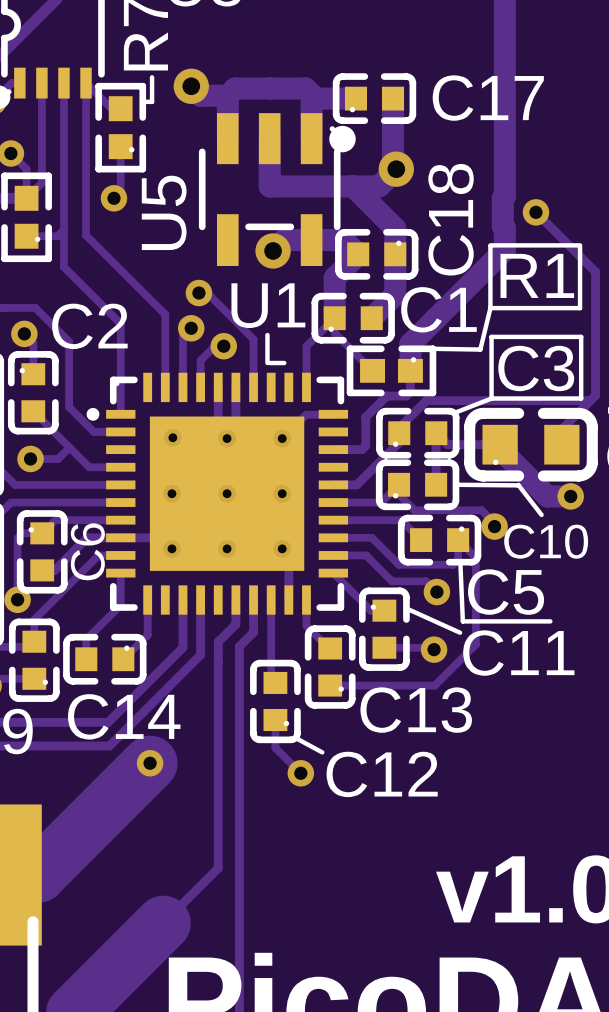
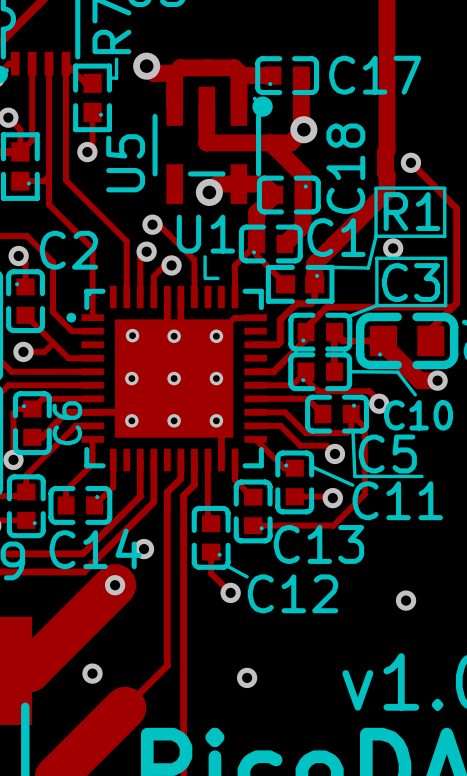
via: none -> (393, 248)
via: none -> (144, 549)
via: none -> (406, 600)
via: none -> (92, 673)
via: none -> (247, 677)

